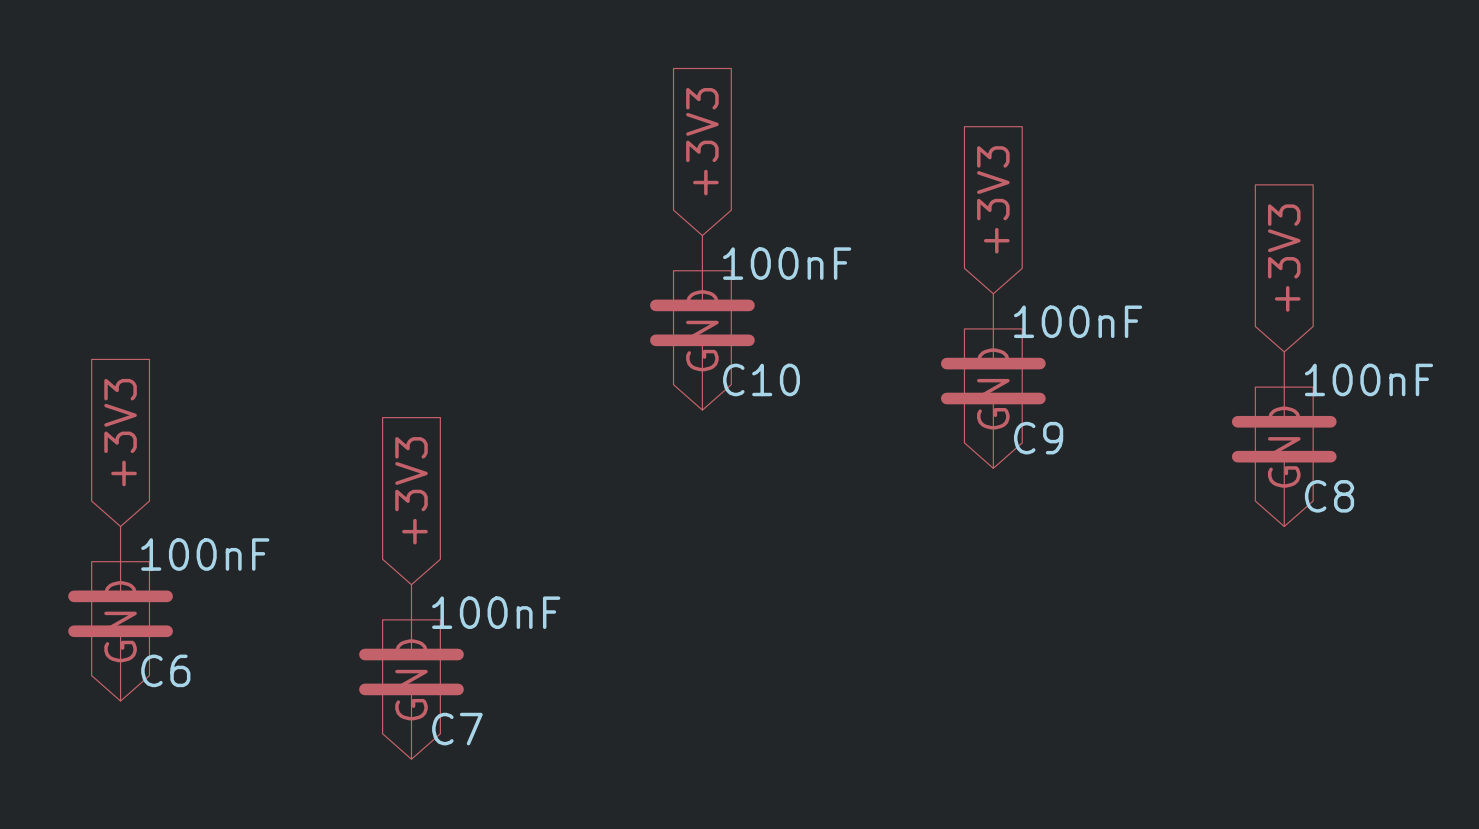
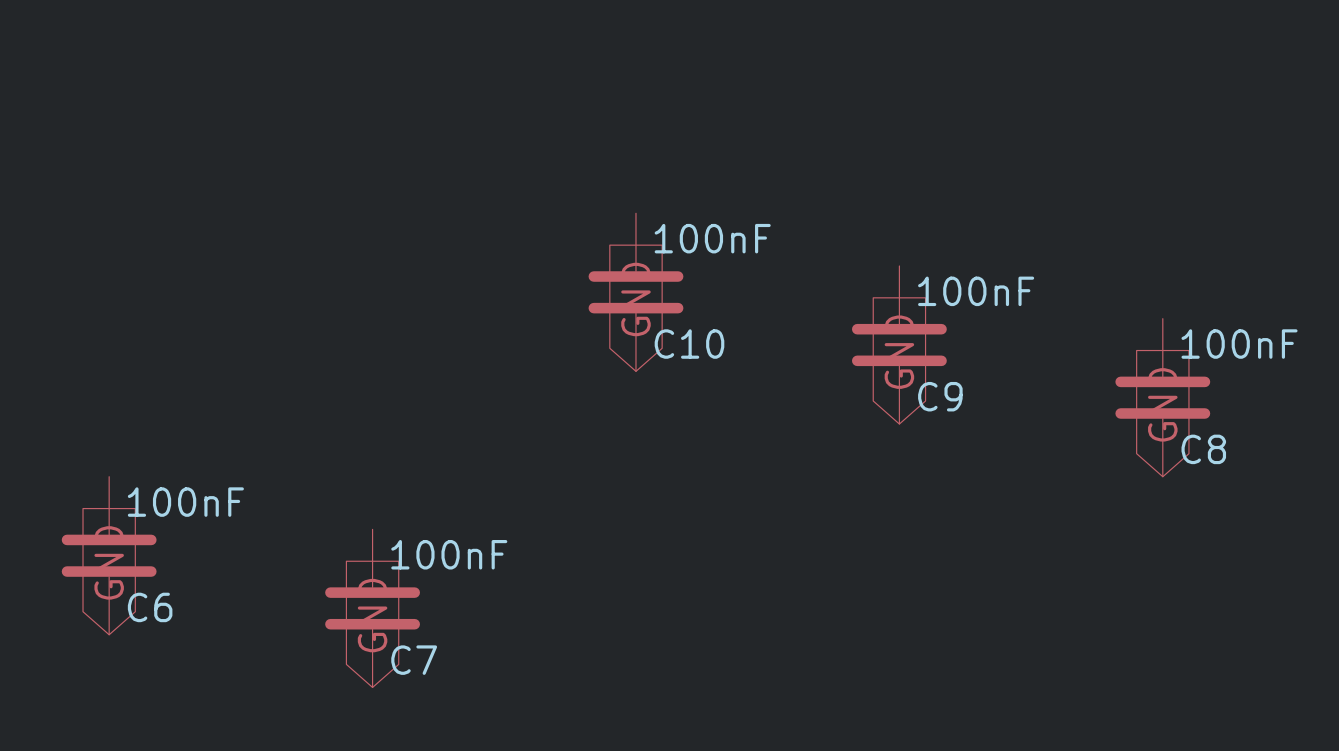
global label: +3V3 (702, 141) -> none
global label: +3V3 (993, 199) -> none
global label: +3V3 (1284, 258) -> none
global label: +3V3 (120, 432) -> none
global label: +3V3 (411, 490) -> none

